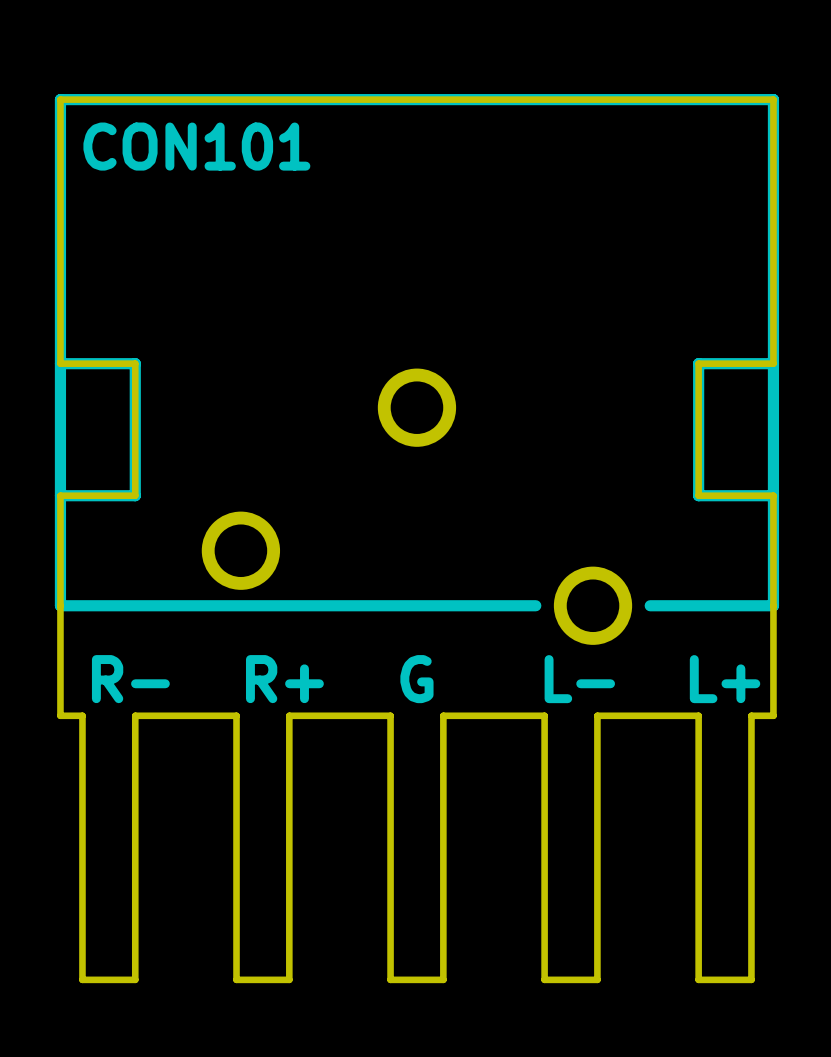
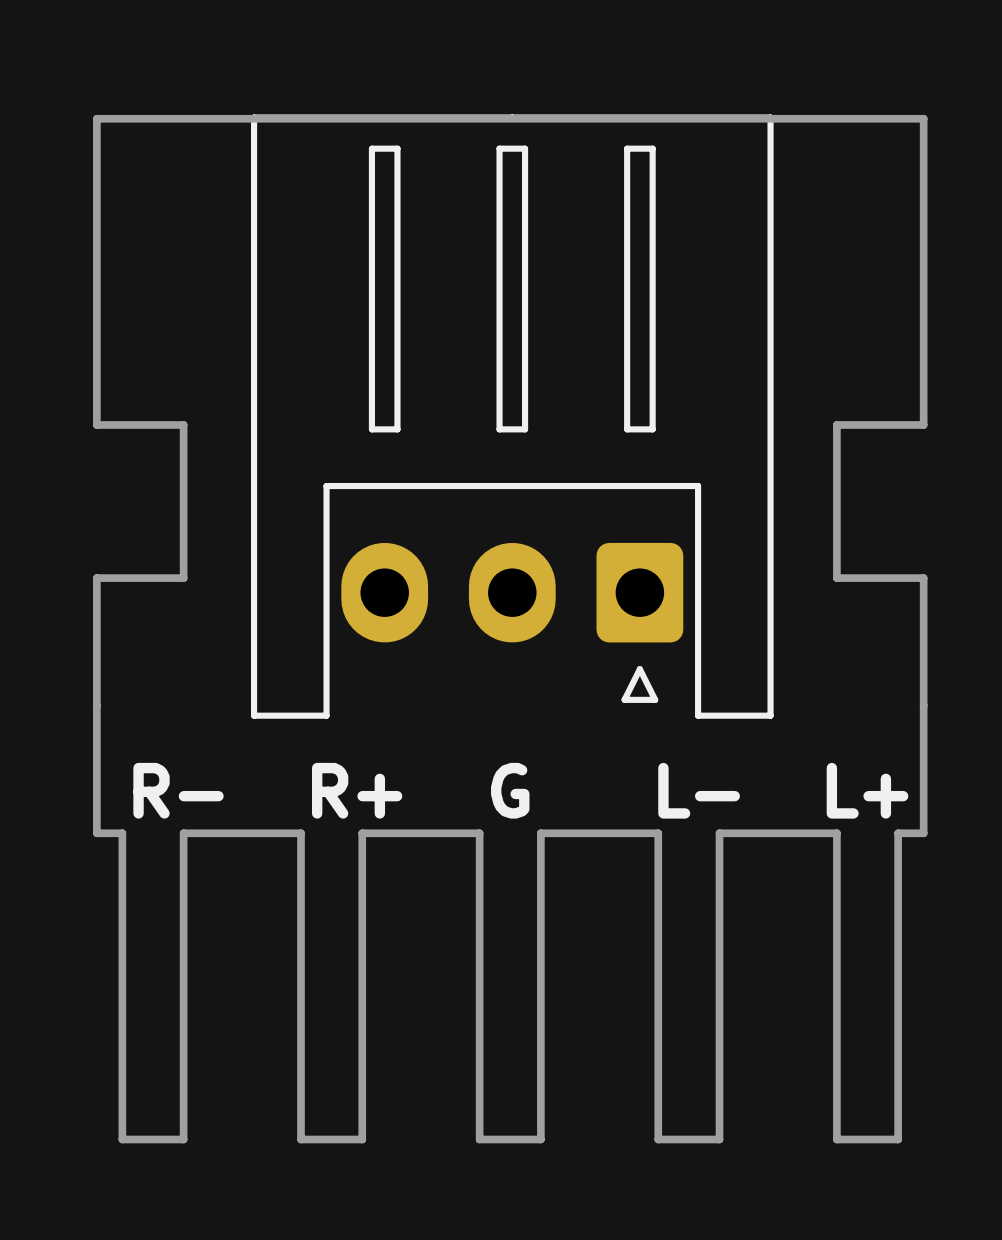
part: none -> (512, 416)
CON101: (416, 369) -> none

